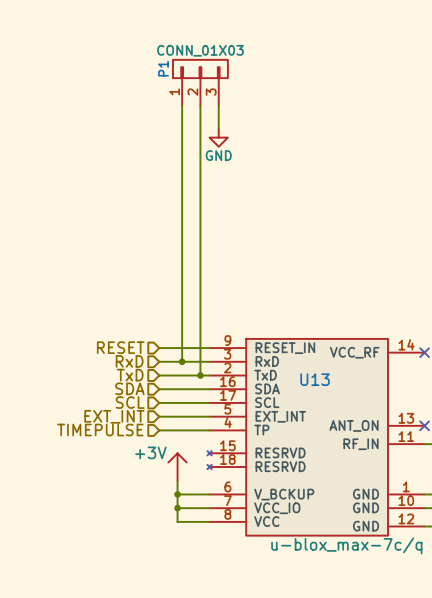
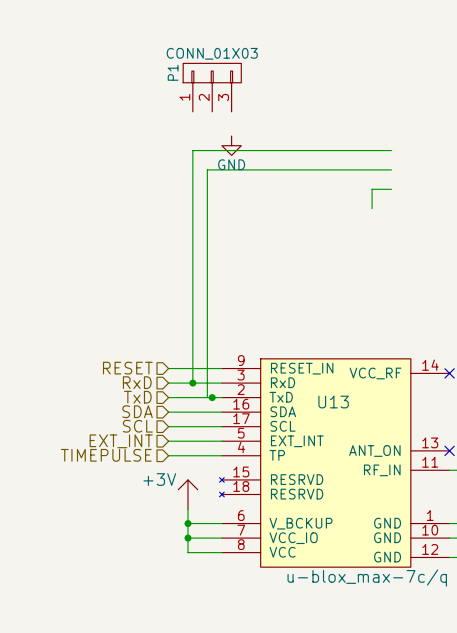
wire: (182, 105) (182, 142) -> (391, 150) (192, 150)
wire: (200, 105) (200, 375) -> none
wire: (218, 105) (218, 128) -> none
wire: none -> (391, 169) (207, 169) (207, 397)
wire: none -> (391, 189) (372, 189) (372, 208)

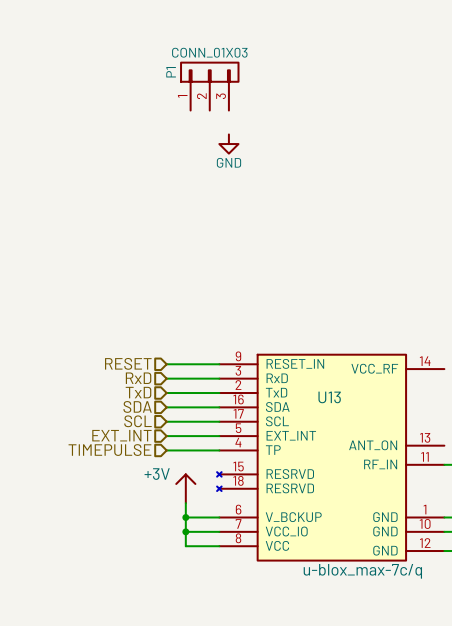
wire: (391, 150) (192, 150) (192, 383) -> none
wire: (391, 169) (207, 169) (207, 397) -> none
wire: (391, 189) (372, 189) (372, 208) -> none
no-connect mark: (449, 373) -> none
junction: (192, 383) -> none
junction: (212, 397) -> none
no-connect mark: (449, 450) -> none

